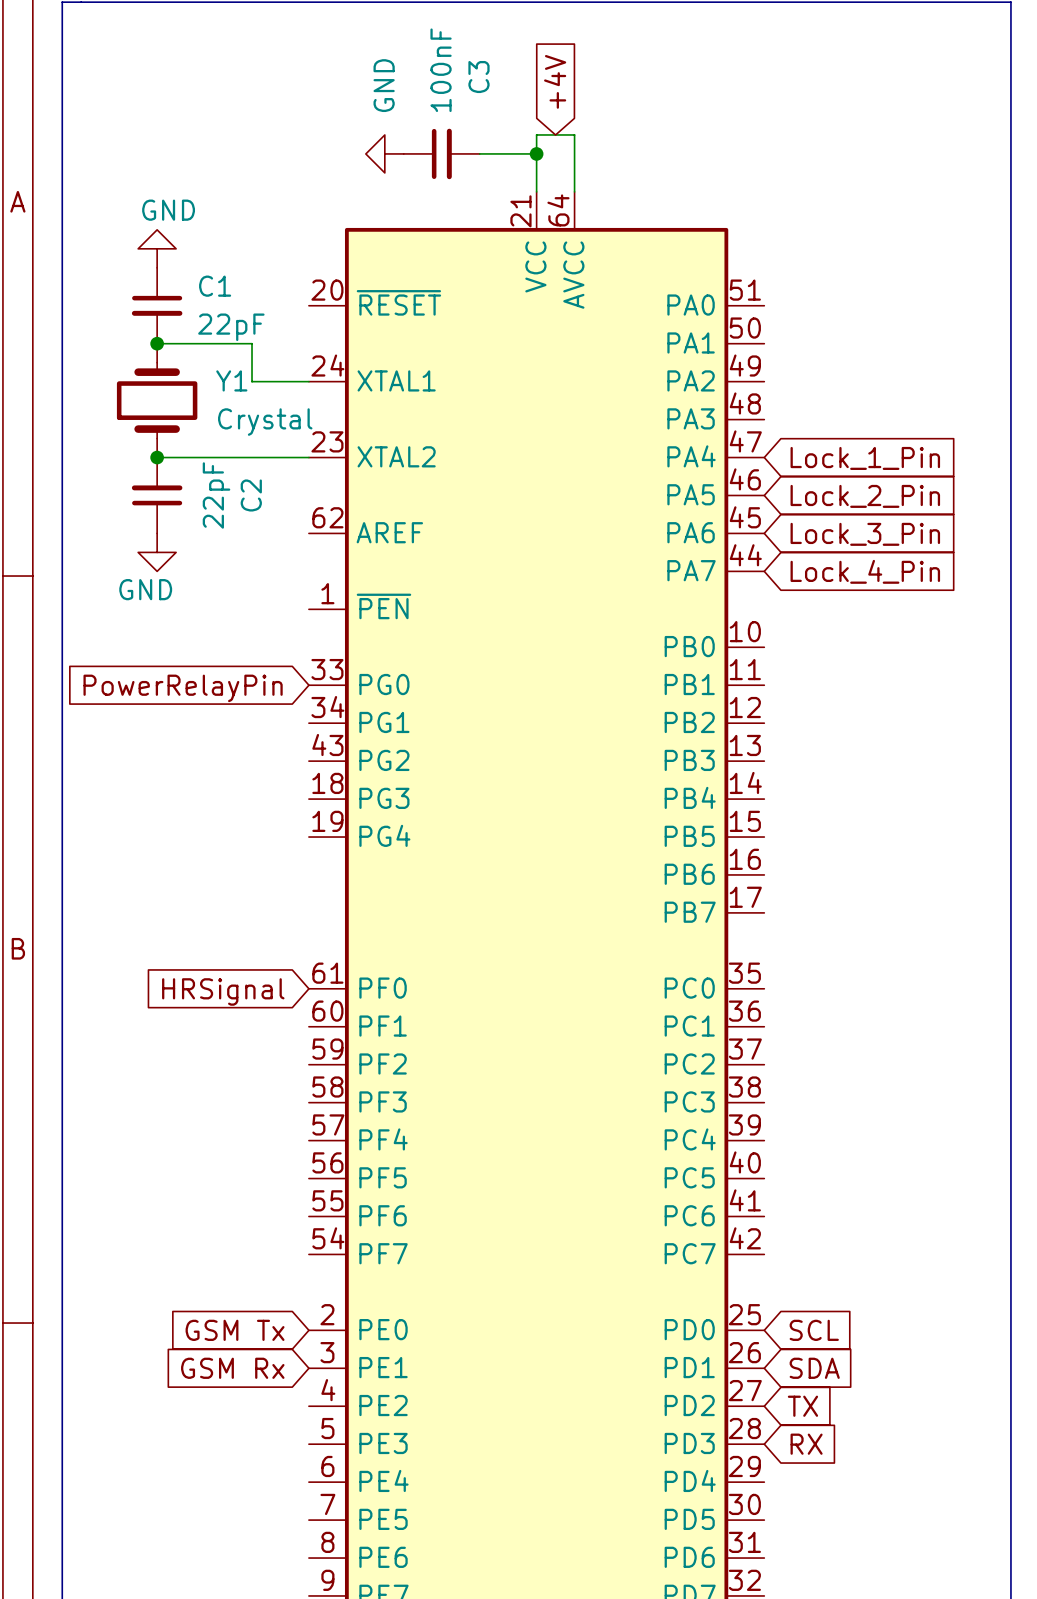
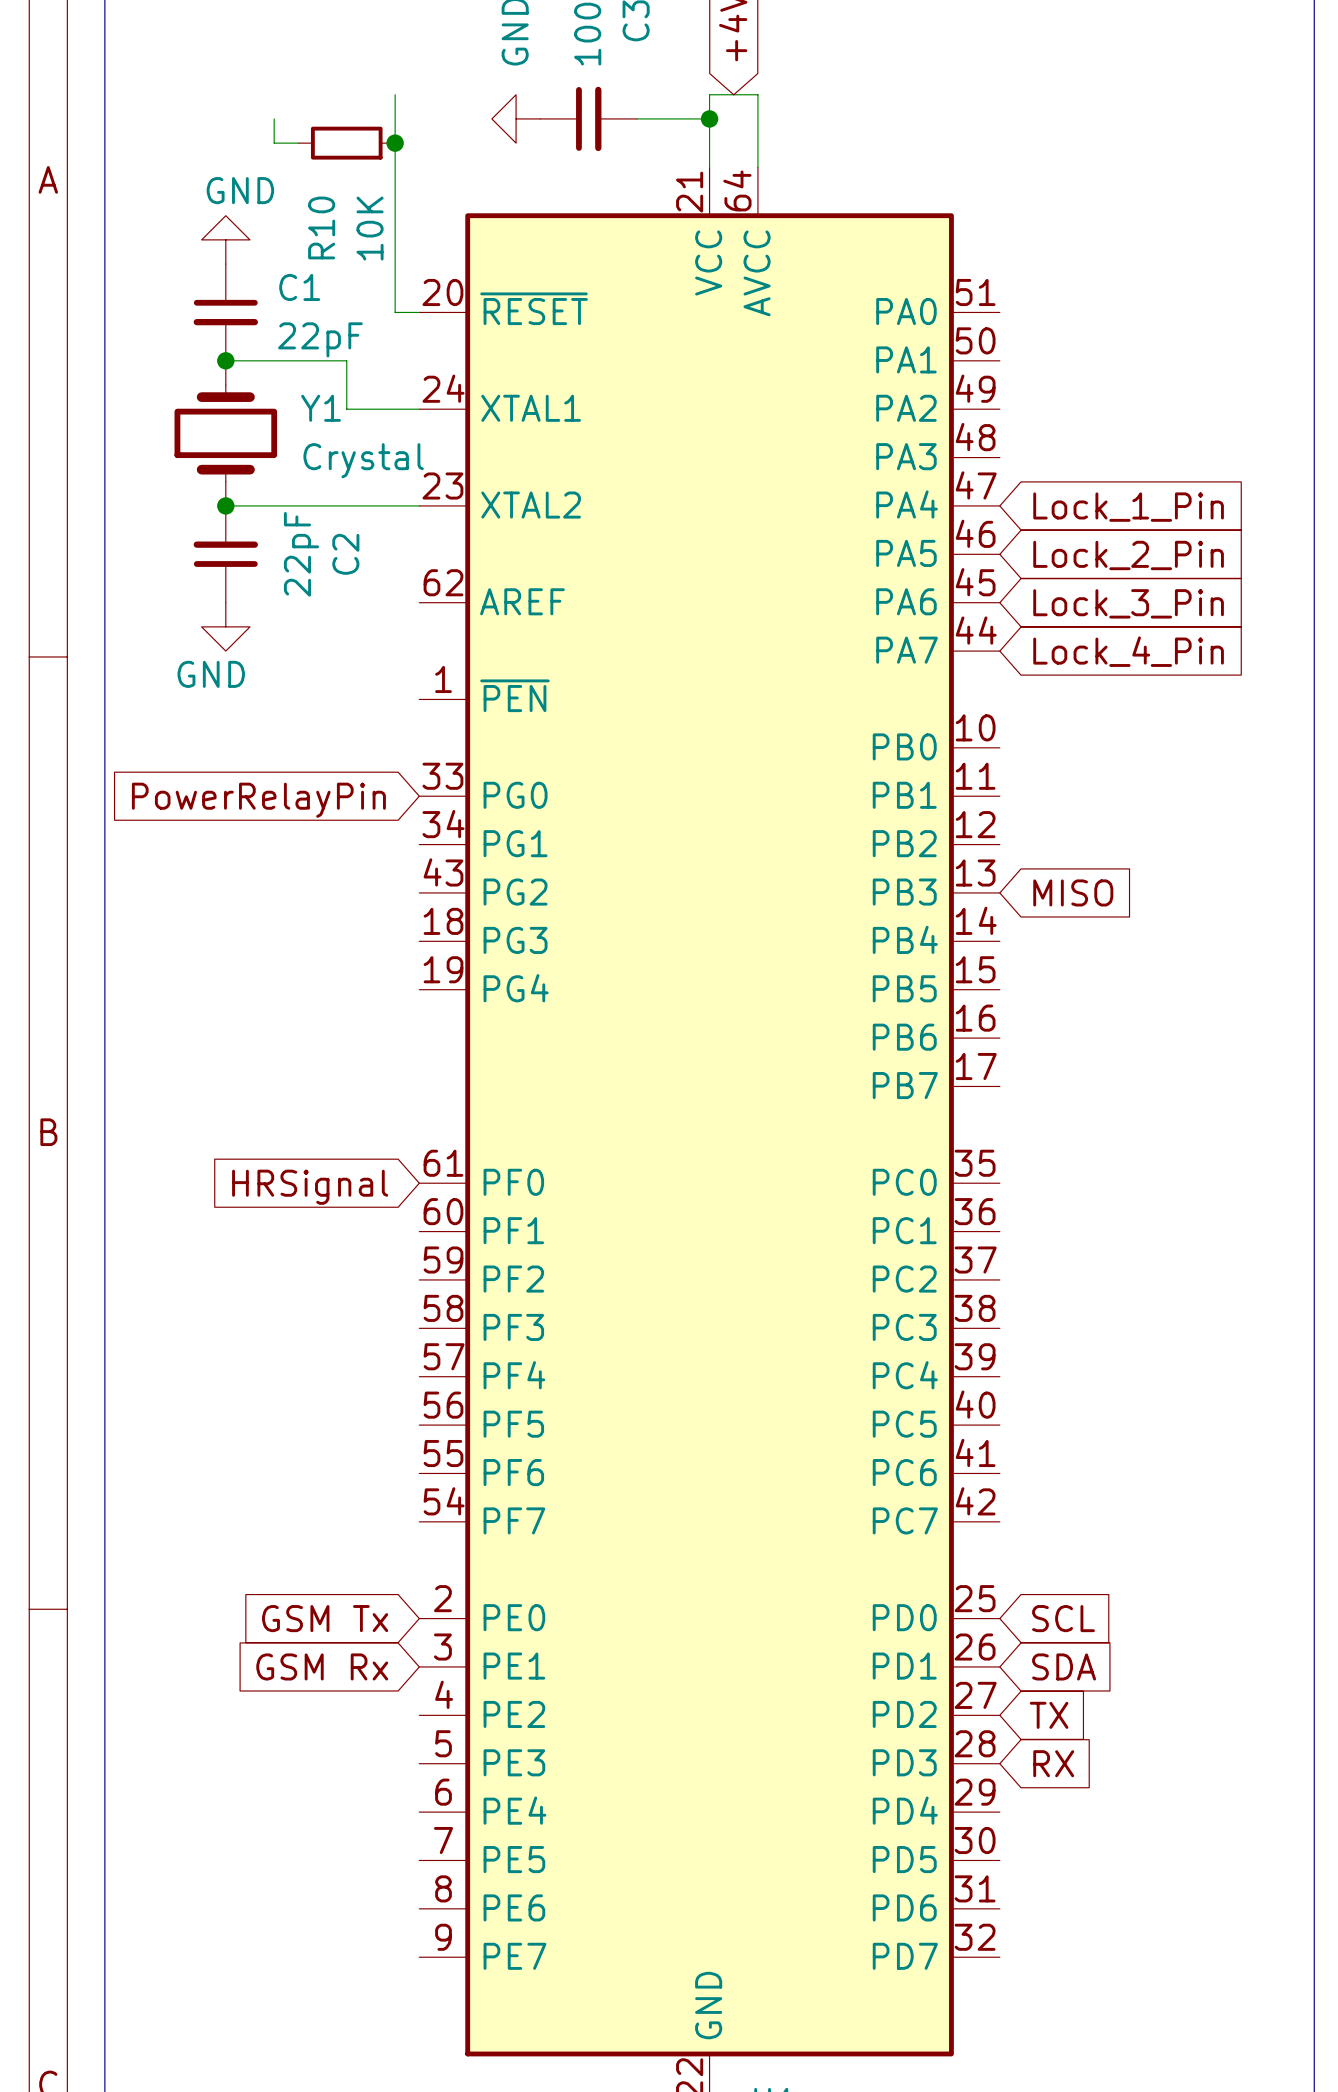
wire: none -> (395, 94) (395, 312) (419, 312)
wire: none -> (274, 118) (274, 143) (298, 143)
R10: none -> 10K (346, 143)
junction: none -> (395, 143)
global label: none -> MISO (1073, 892)

